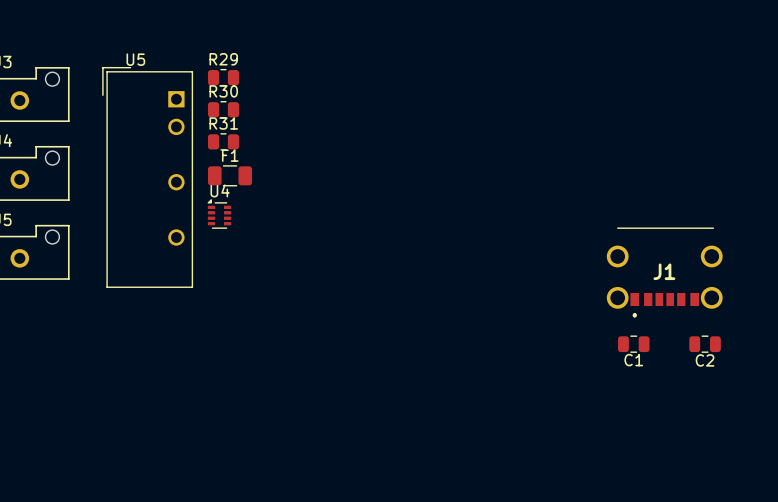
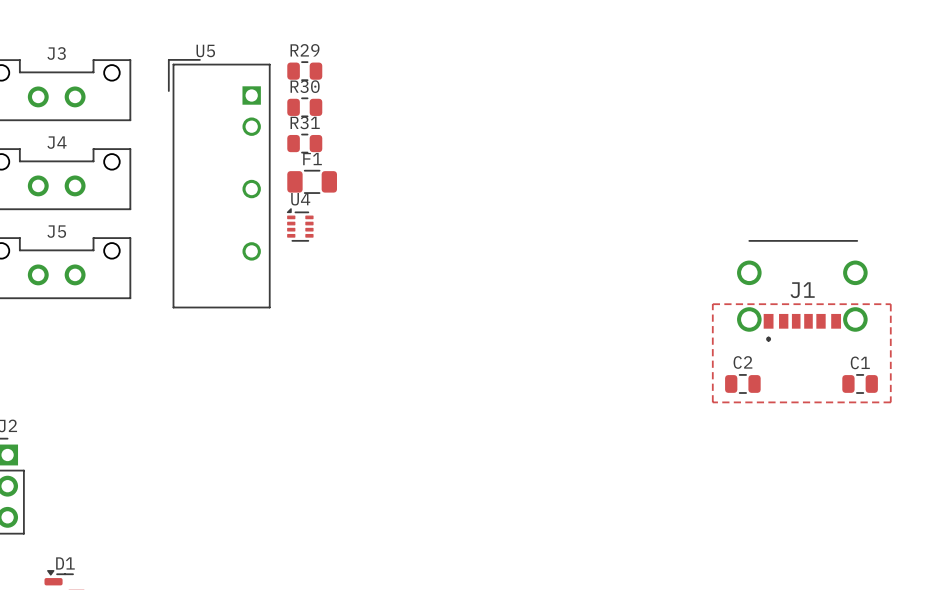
top zone outline: none -> (712, 304) (890, 304) (890, 402) (712, 402) (712, 304)
C1 position: (633, 344) -> (860, 383)
C2 position: (705, 344) -> (742, 383)
C1 name position: C1 (633, 360) -> C1 (860, 362)
C2 name position: C2 (705, 360) -> C2 (742, 362)

